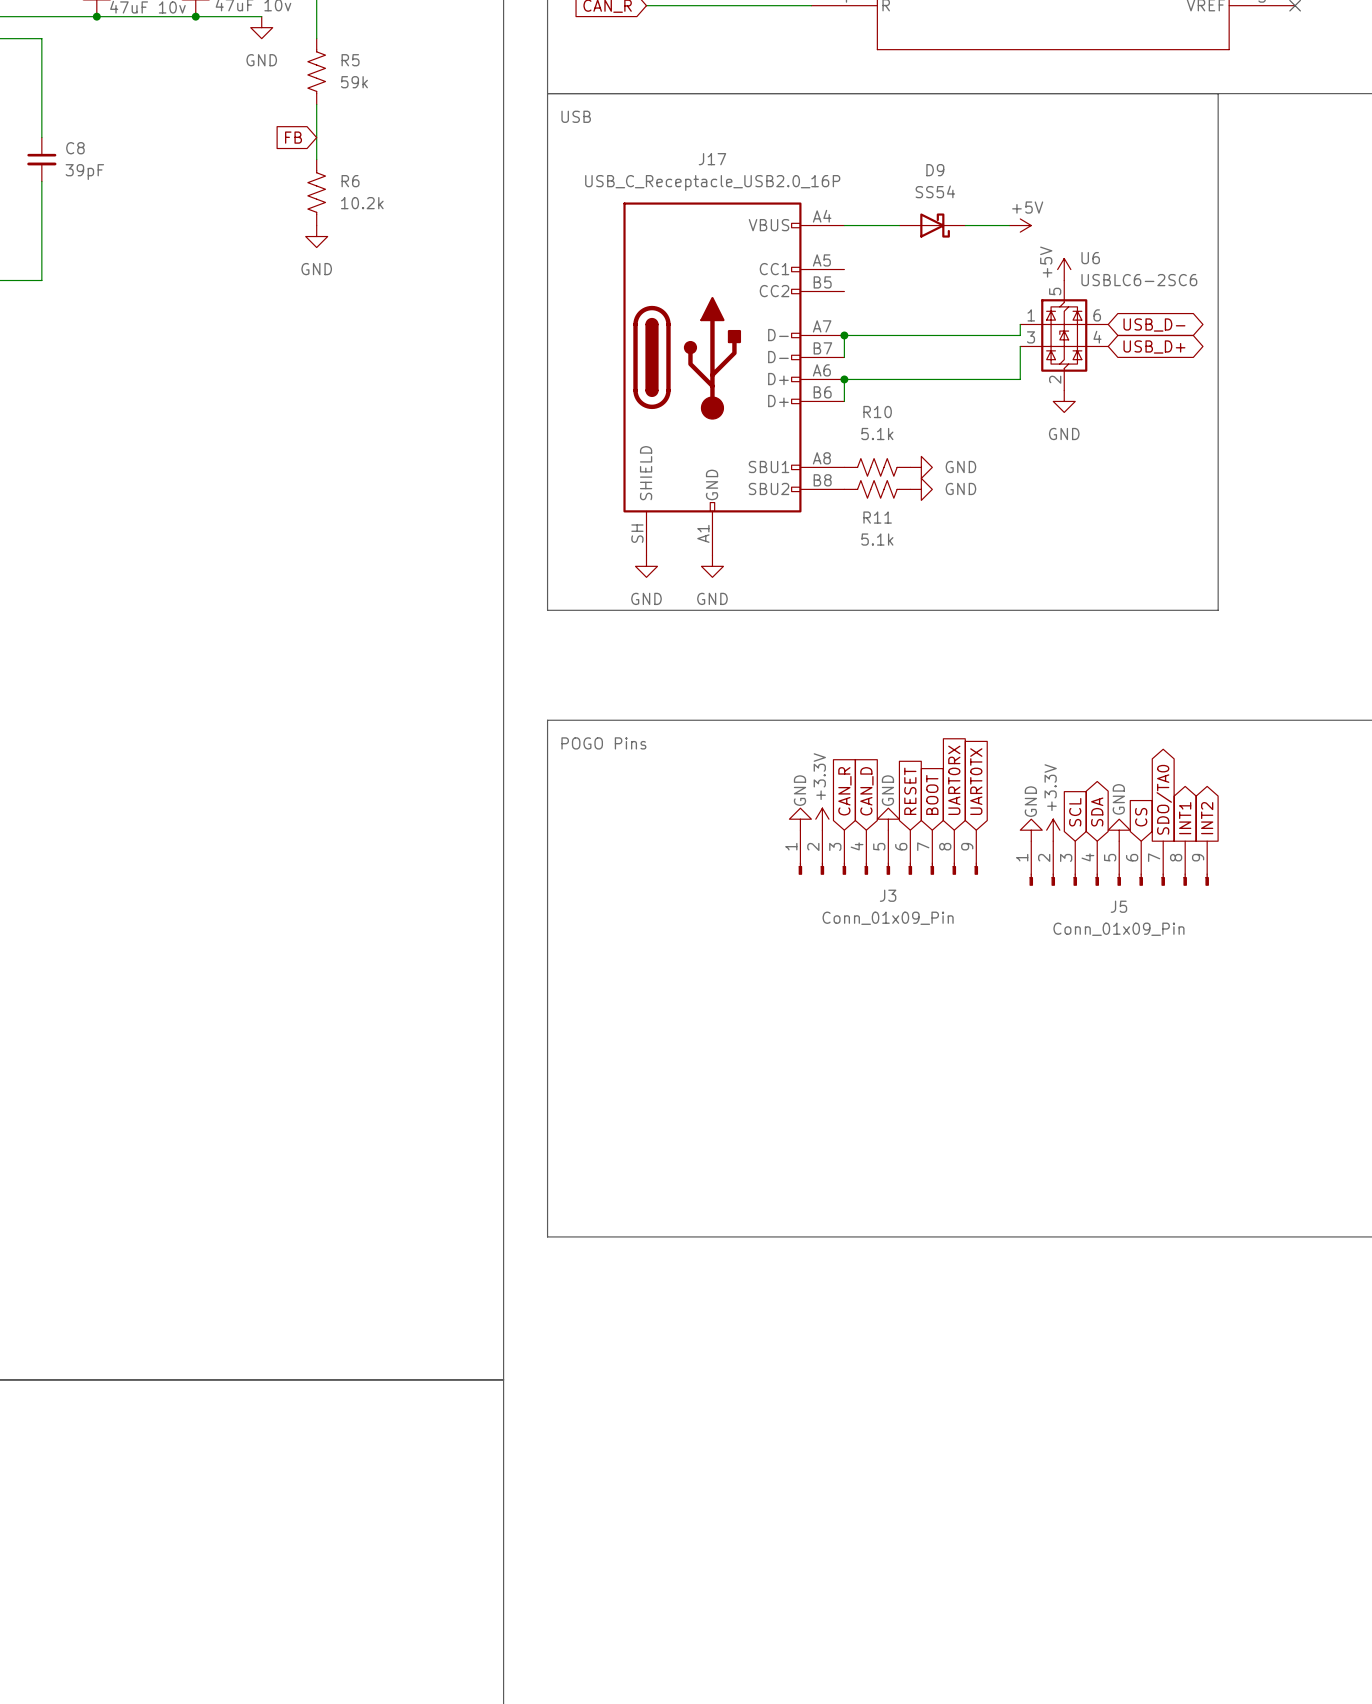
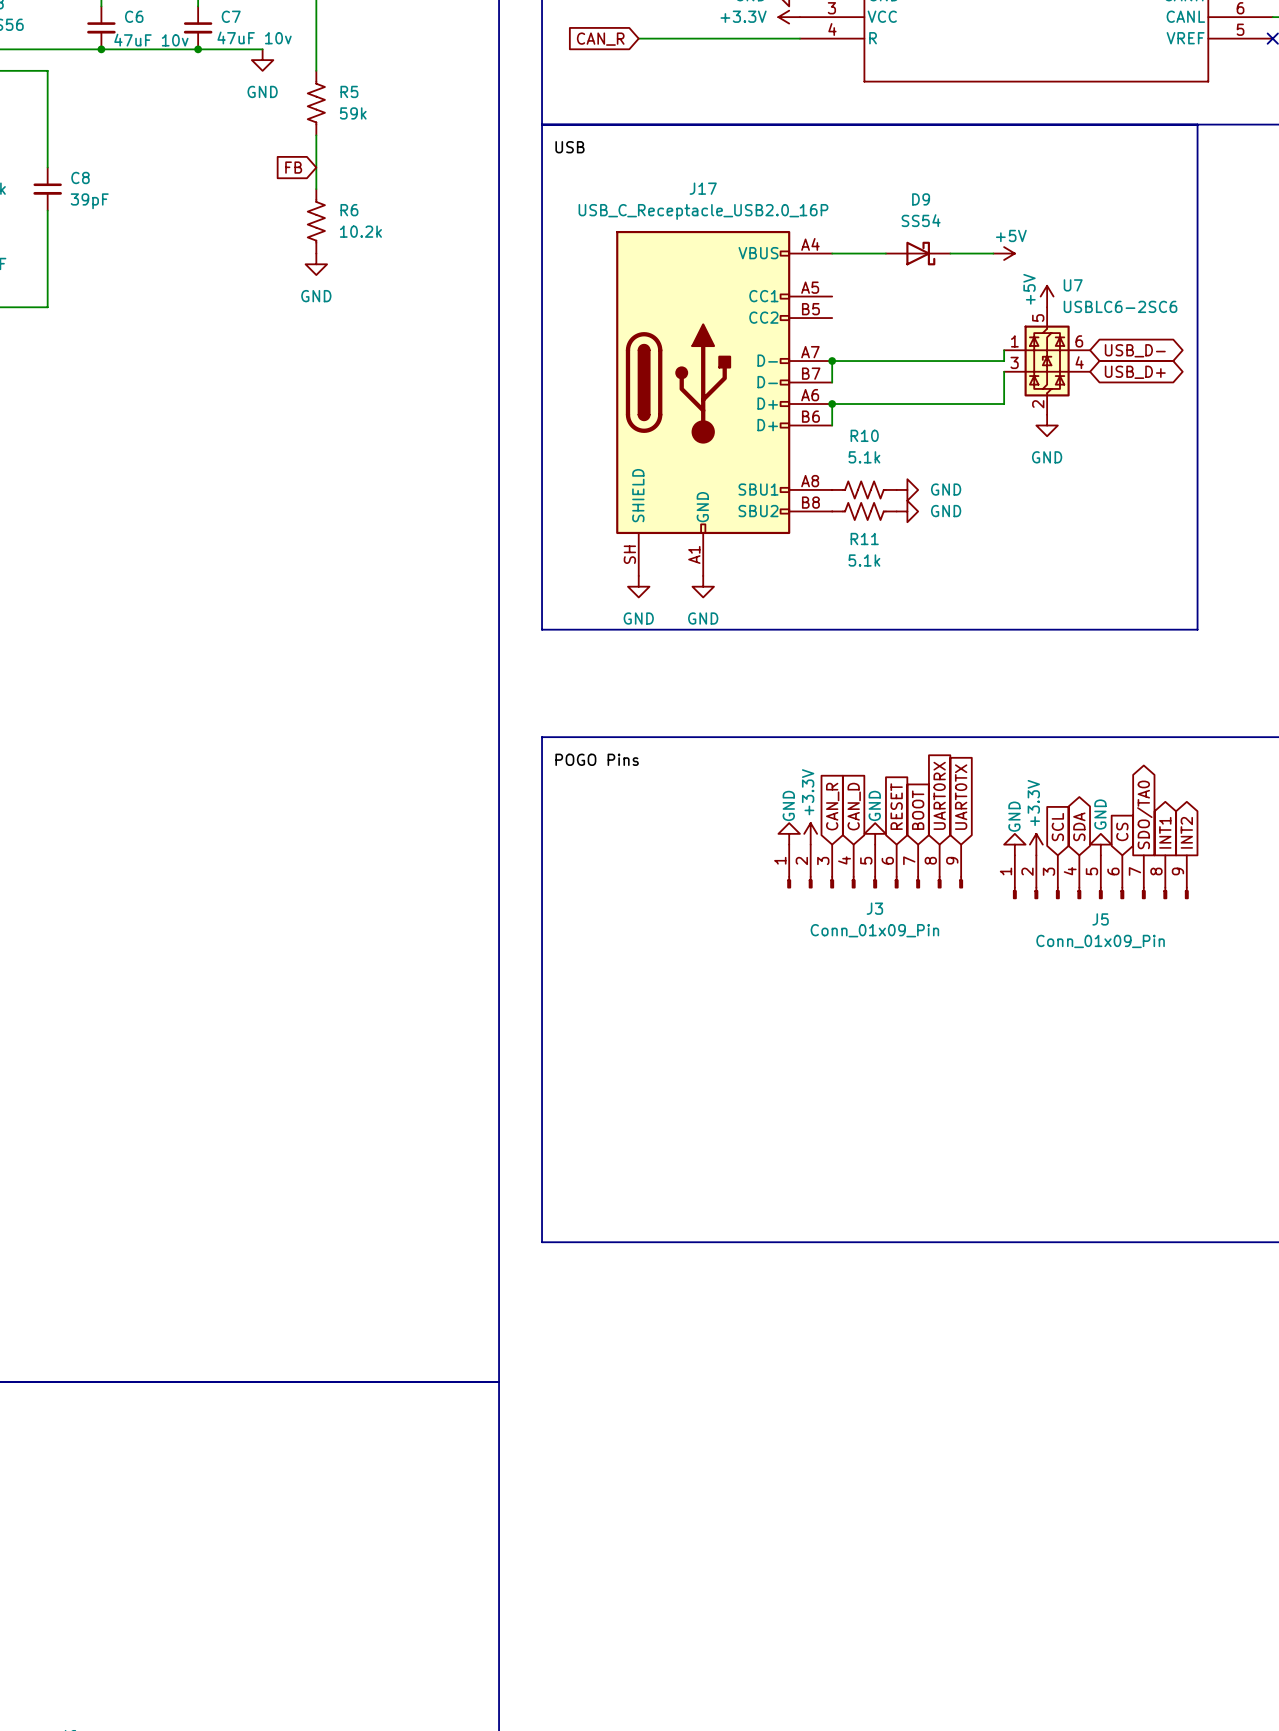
U6 name: U6 (1090, 258) -> U7 (1073, 285)

